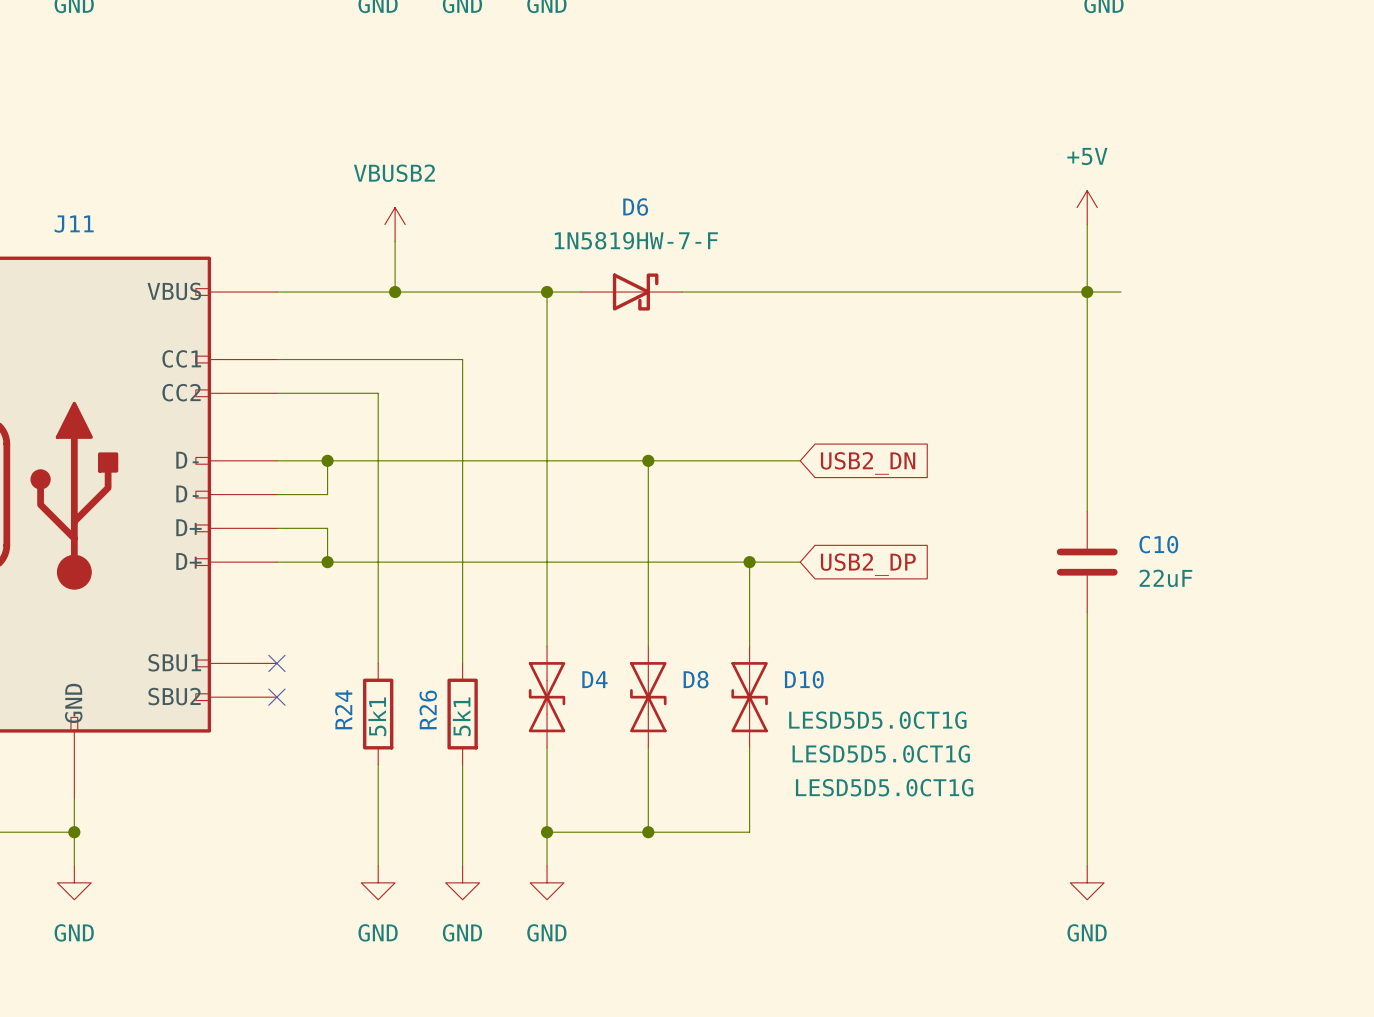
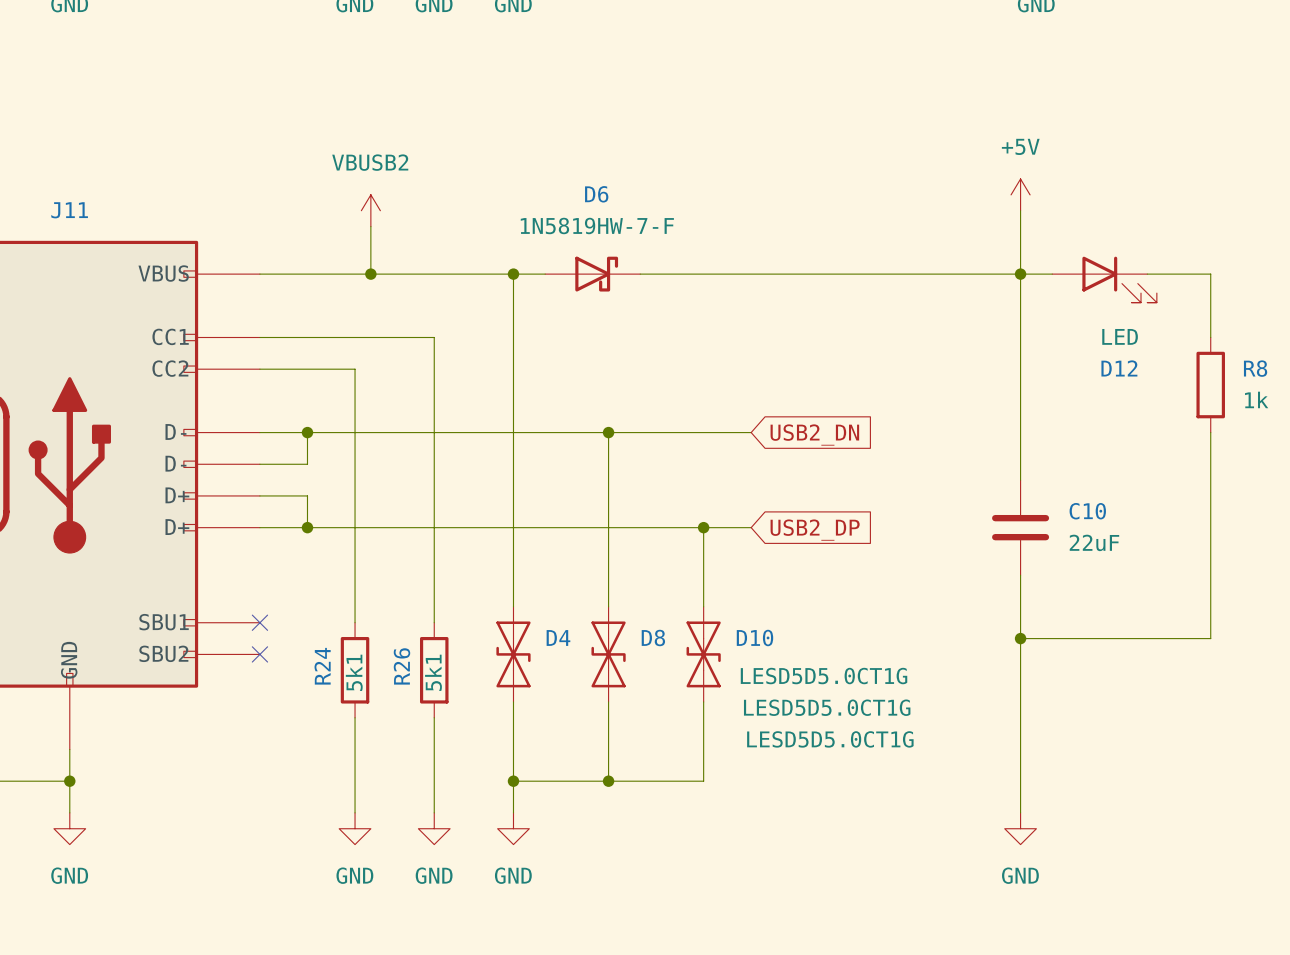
wire: none -> (1147, 274) (1210, 274) (1210, 337)
D12: none -> LED (1104, 279)
R8: none -> 1k (1210, 385)
wire: none -> (1210, 432) (1210, 638) (1020, 638)
junction: none -> (1020, 638)

